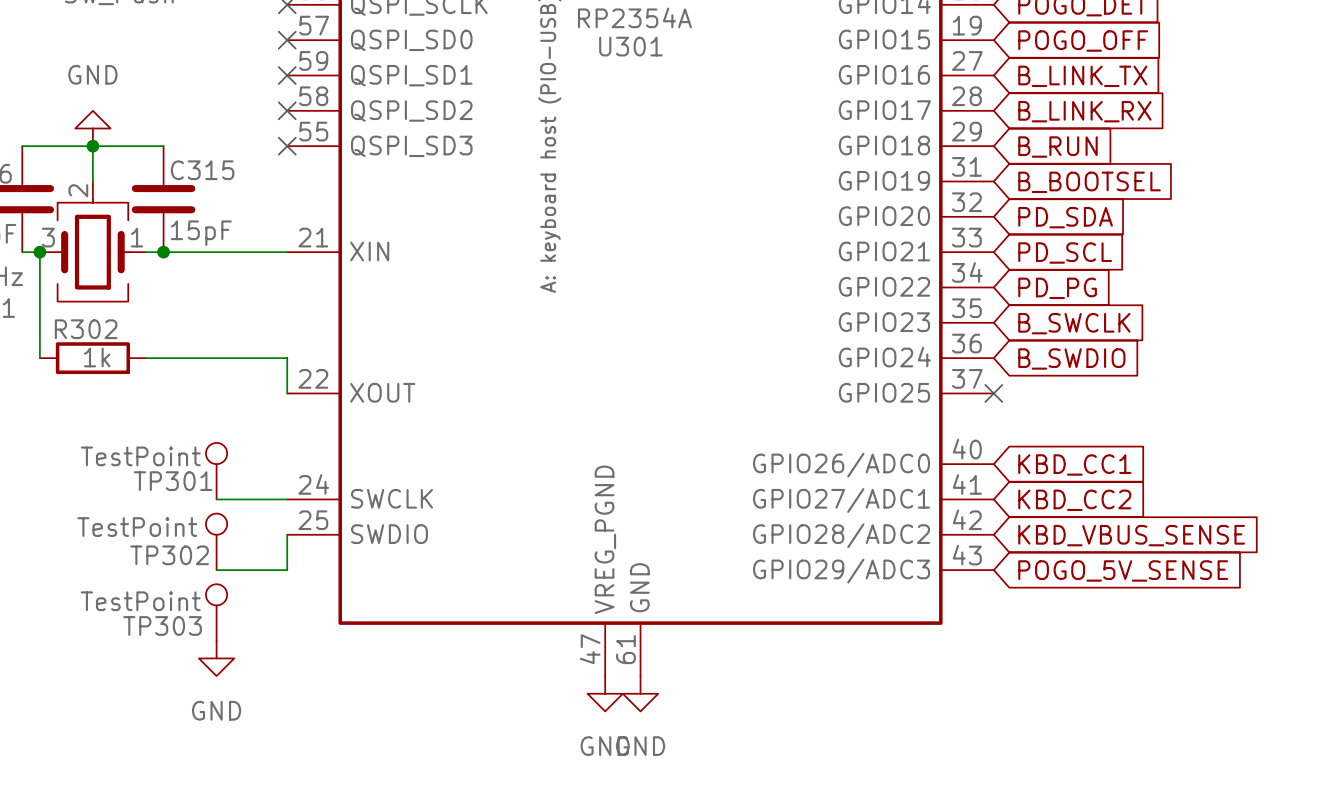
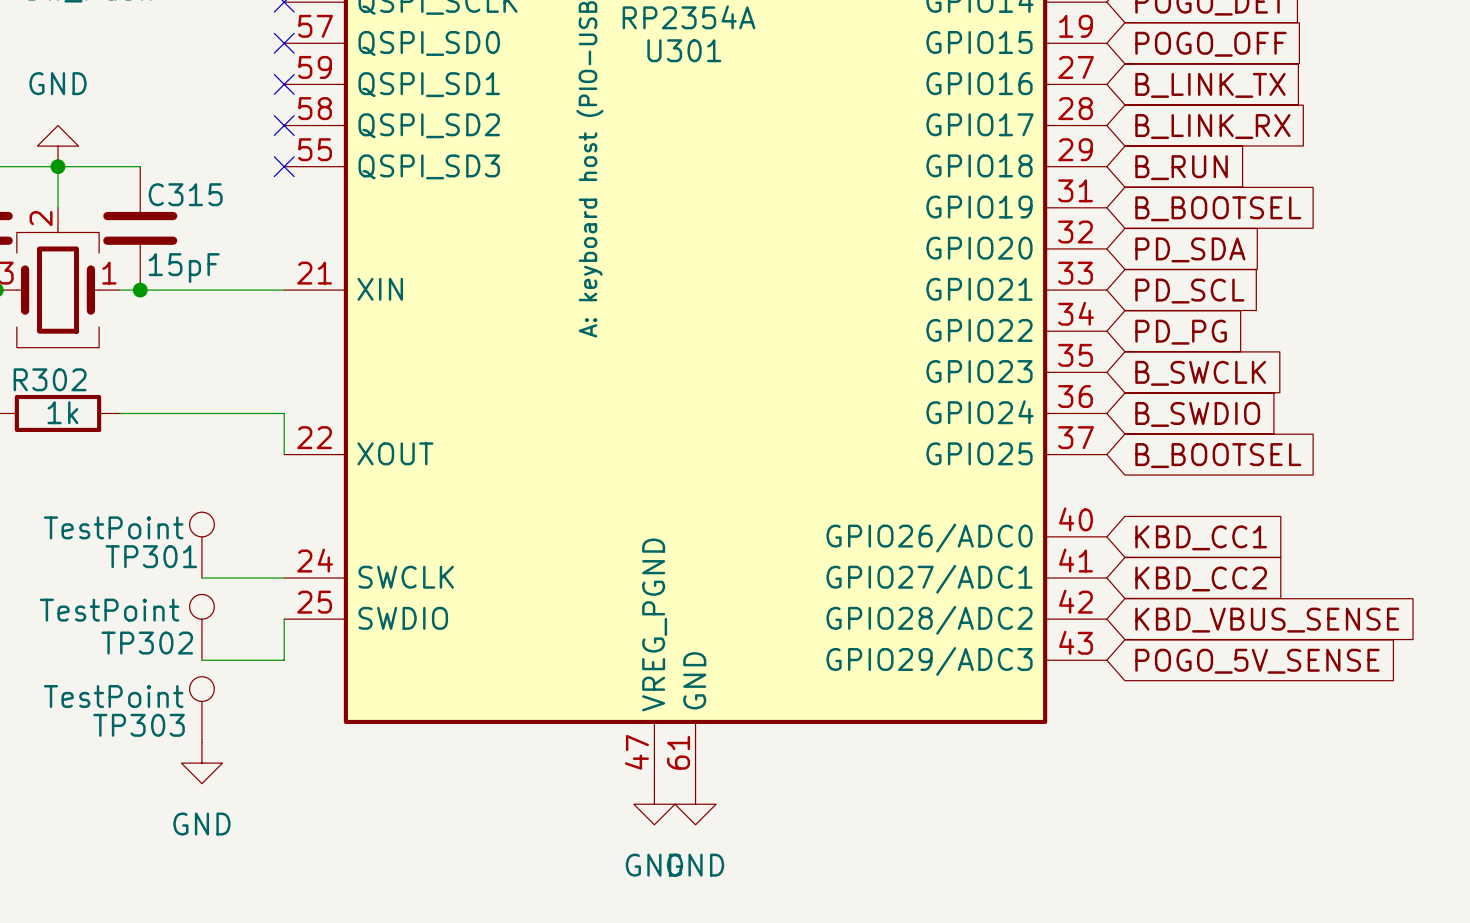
no-connect mark: (993, 393) -> none
global label: none -> B_BOOTSEL (1218, 455)

